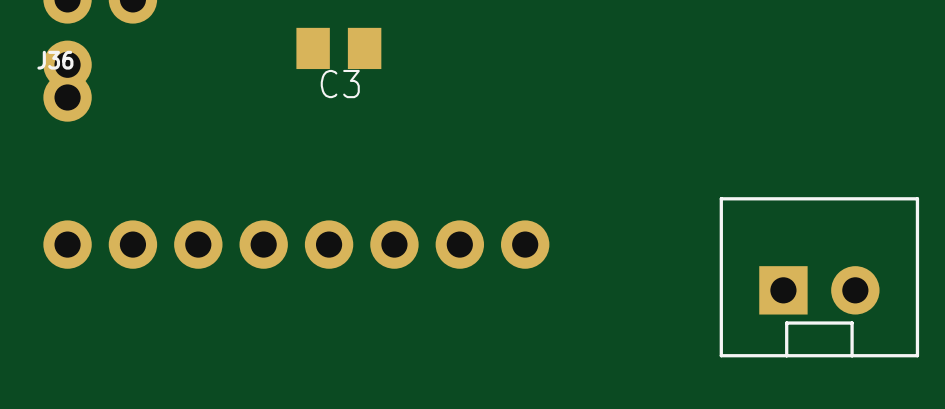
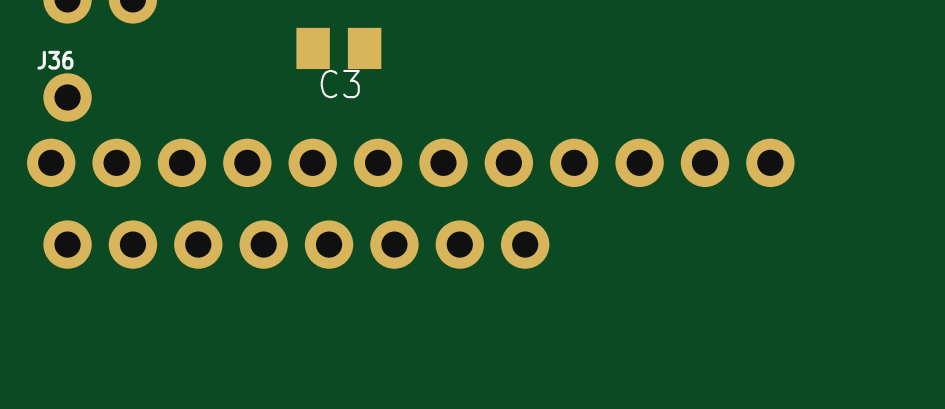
part: (67, 64) -> none
part: none -> (410, 162)
part: (819, 277) -> none

